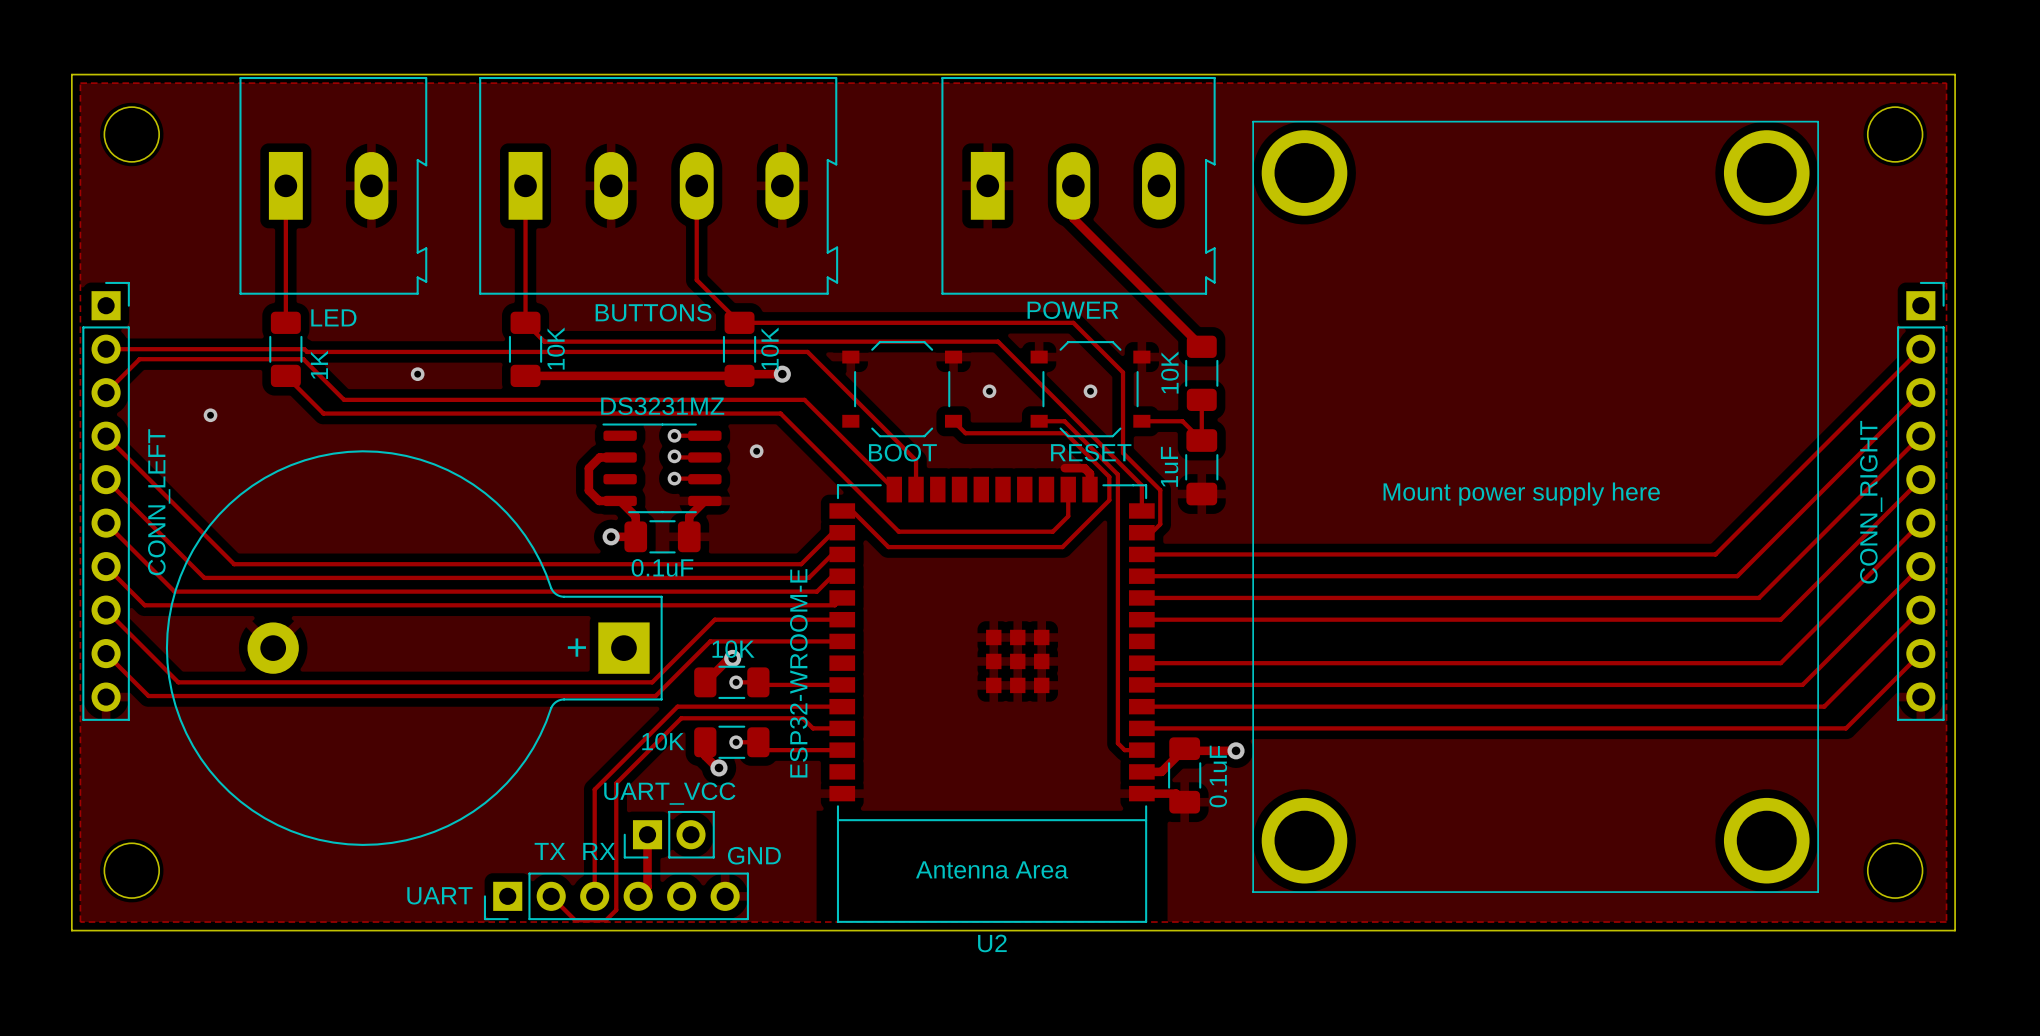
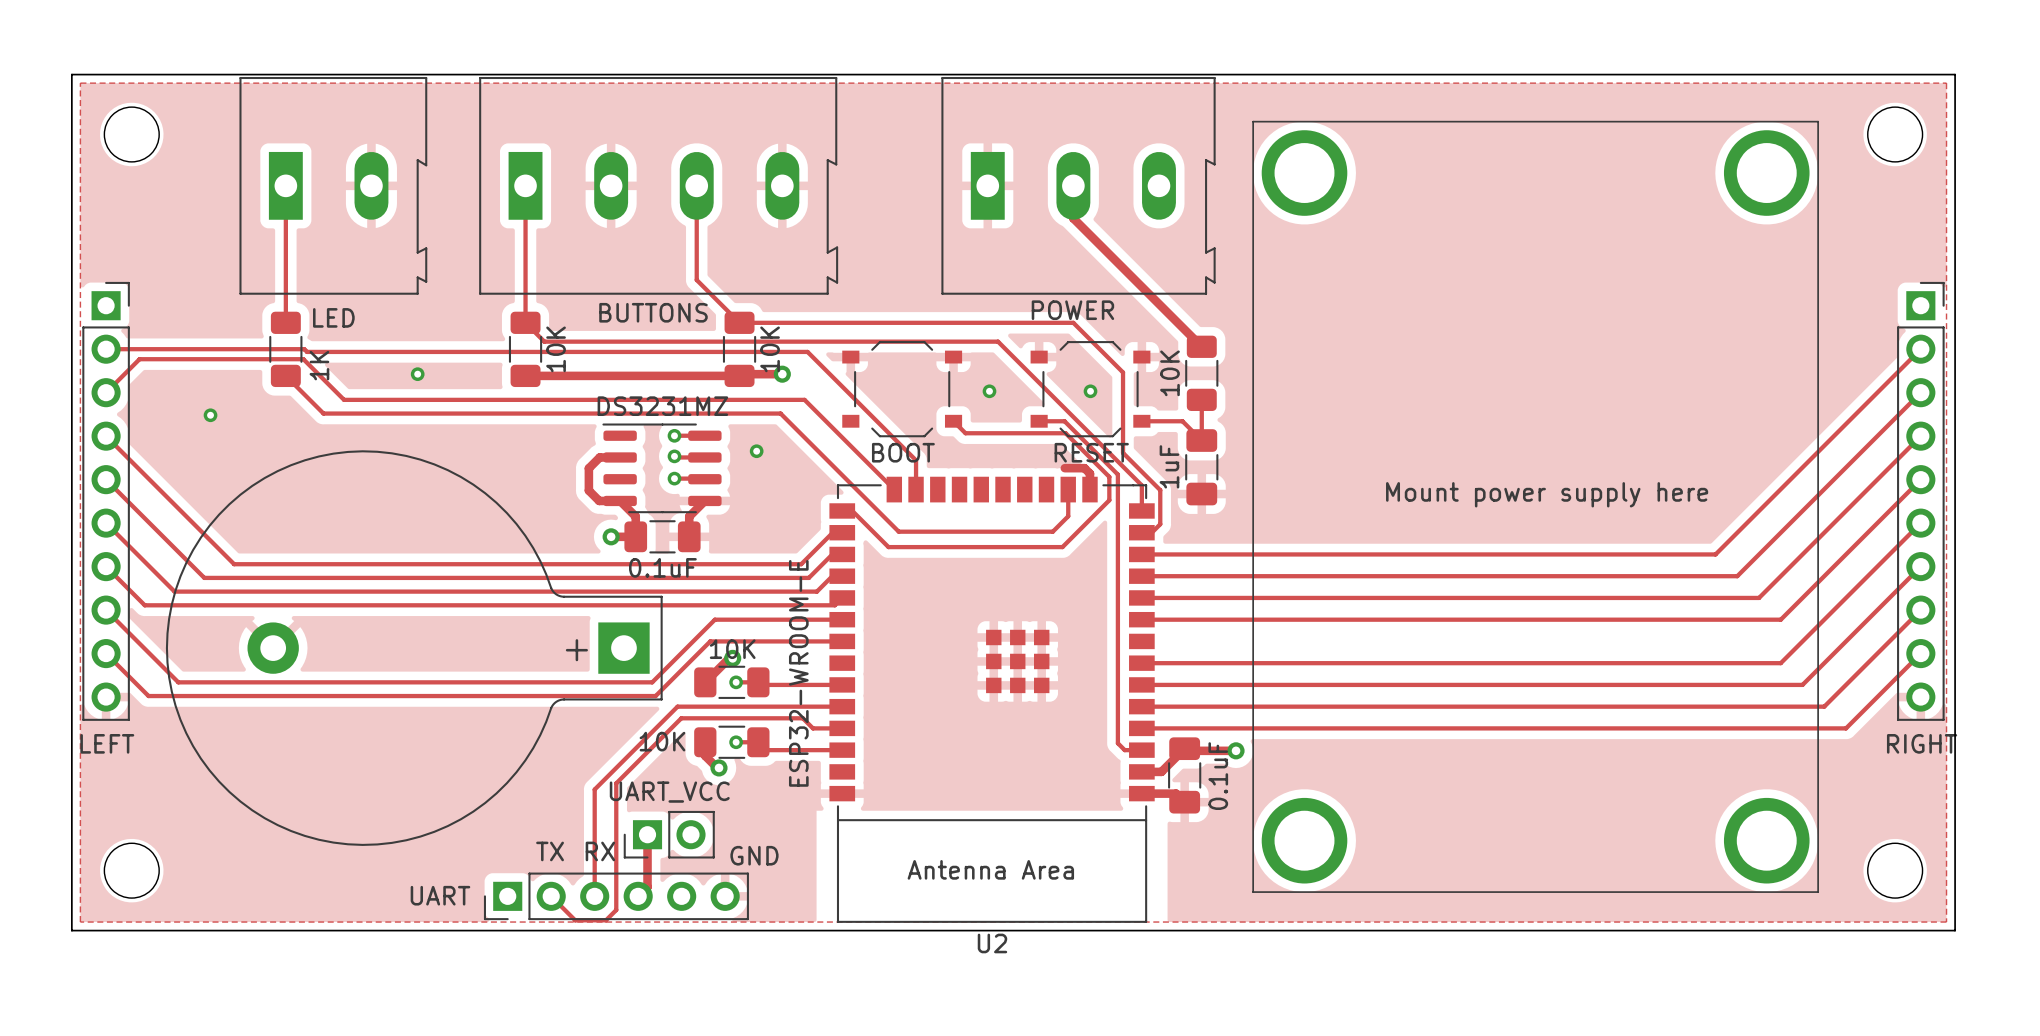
part value: CONN_LEFT (159, 502) -> LEFT (107, 743)
part value: CONN_RIGHT (1871, 502) -> RIGHT (1922, 743)

